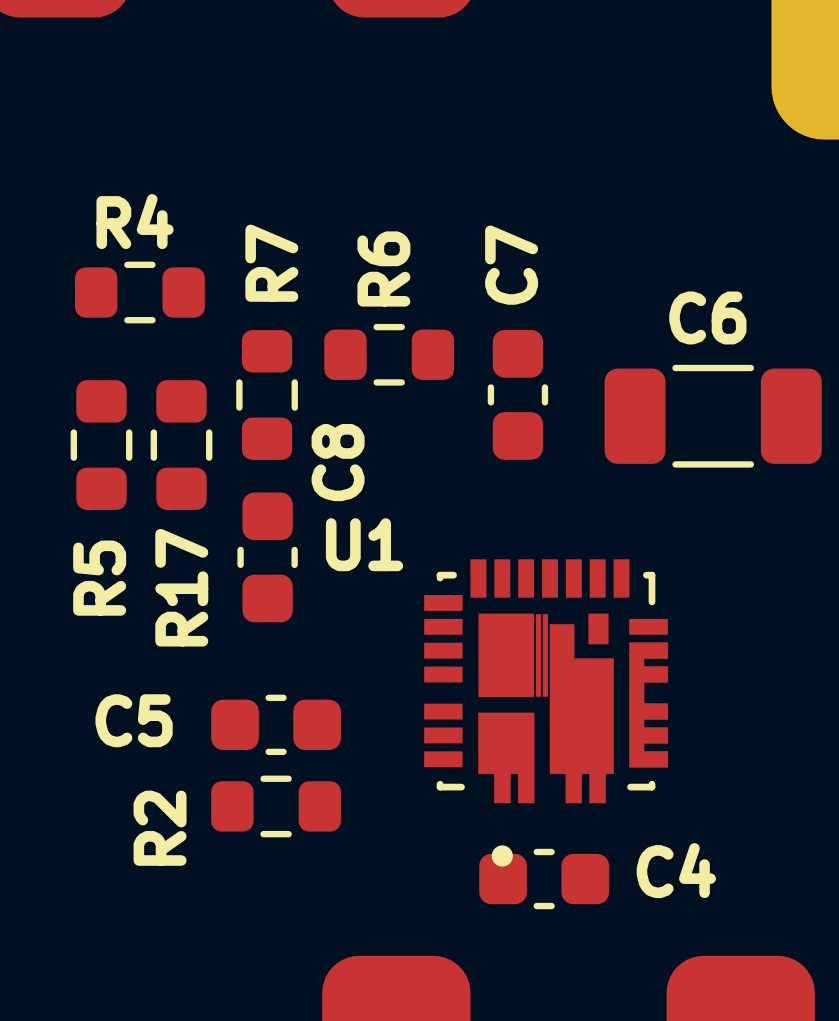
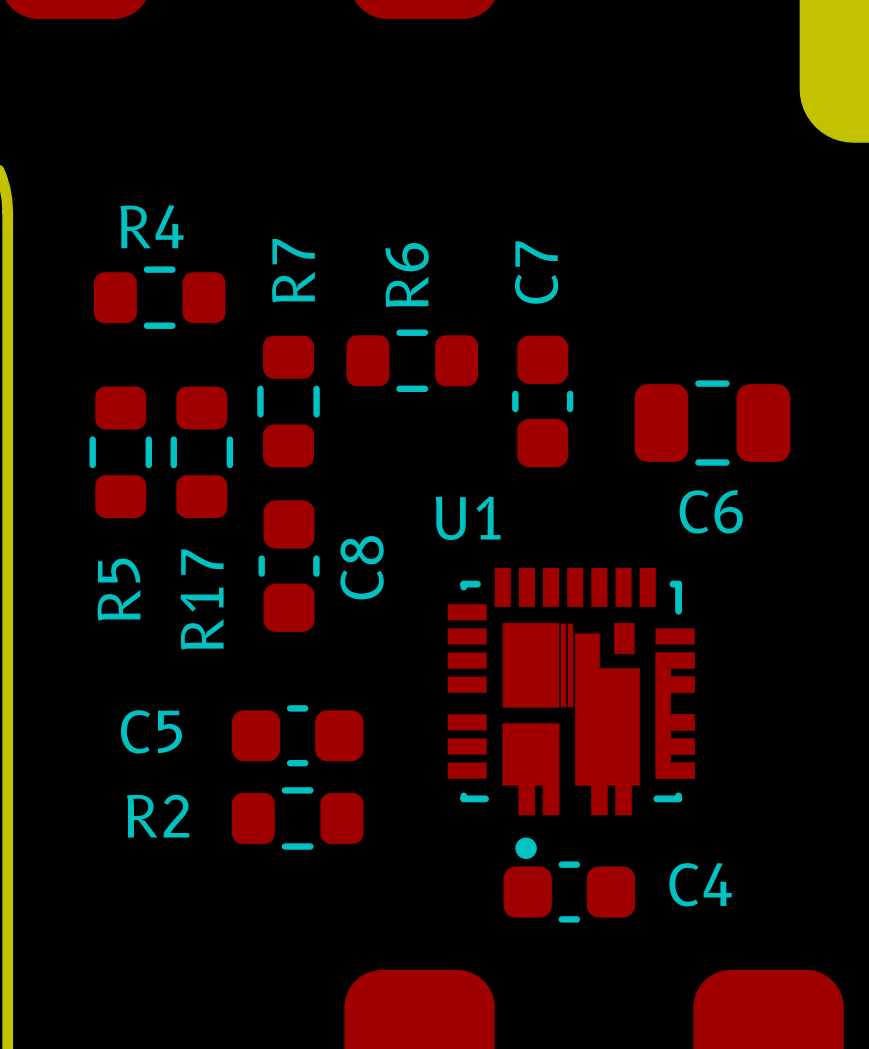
C6 name position: C6 (707, 317) -> C6 (711, 511)
C6 footprint: [604, 364, 822, 468] -> [634, 380, 791, 466]
C8 name position: C8 (338, 462) -> C8 (362, 567)
U1 name position: U1 (364, 544) -> U1 (468, 518)
U1 footprint: [424, 559, 669, 867] -> [447, 568, 695, 860]
R2 name rotation: 0° (160, 828) -> 90° clockwise (158, 816)

